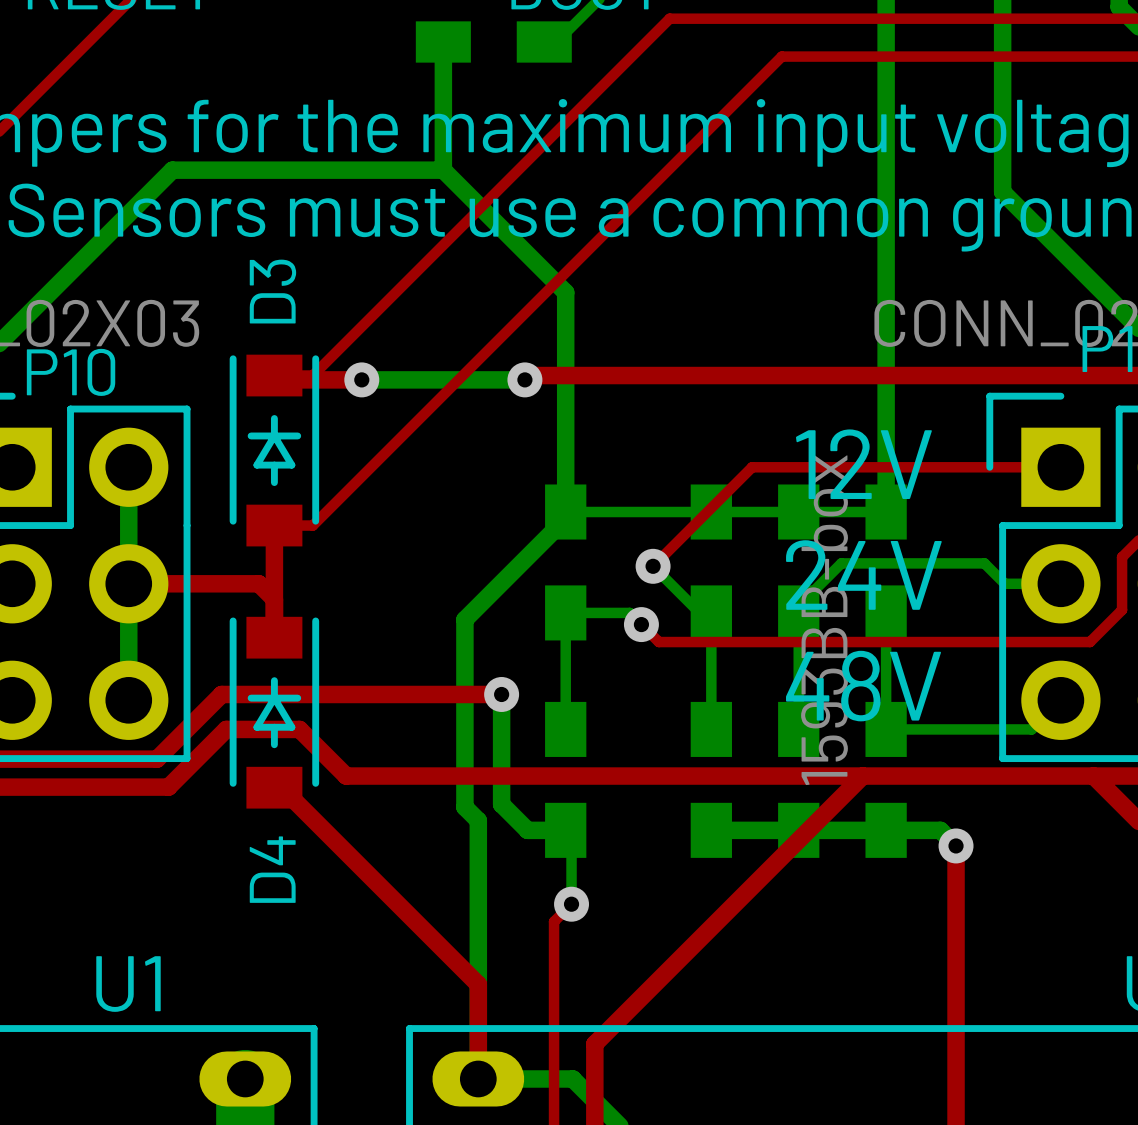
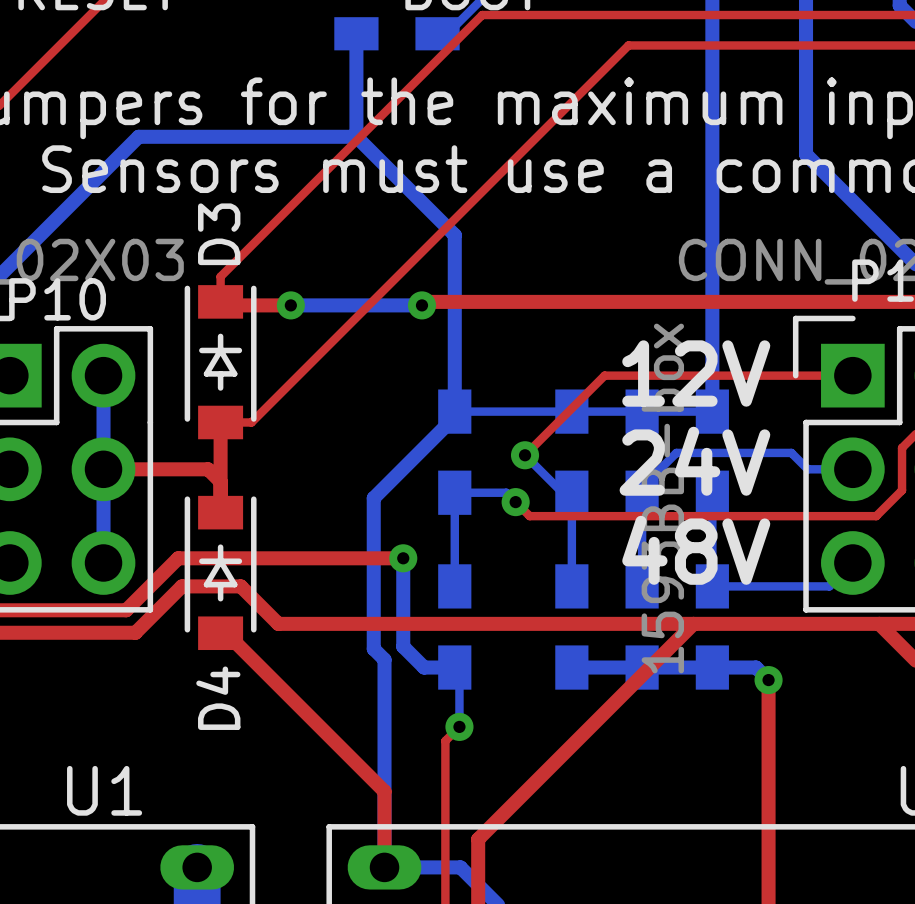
top track: (669, 18) (312, 375) (274, 375) -> (538, 15) (482, 15) (220, 276) (220, 301)

